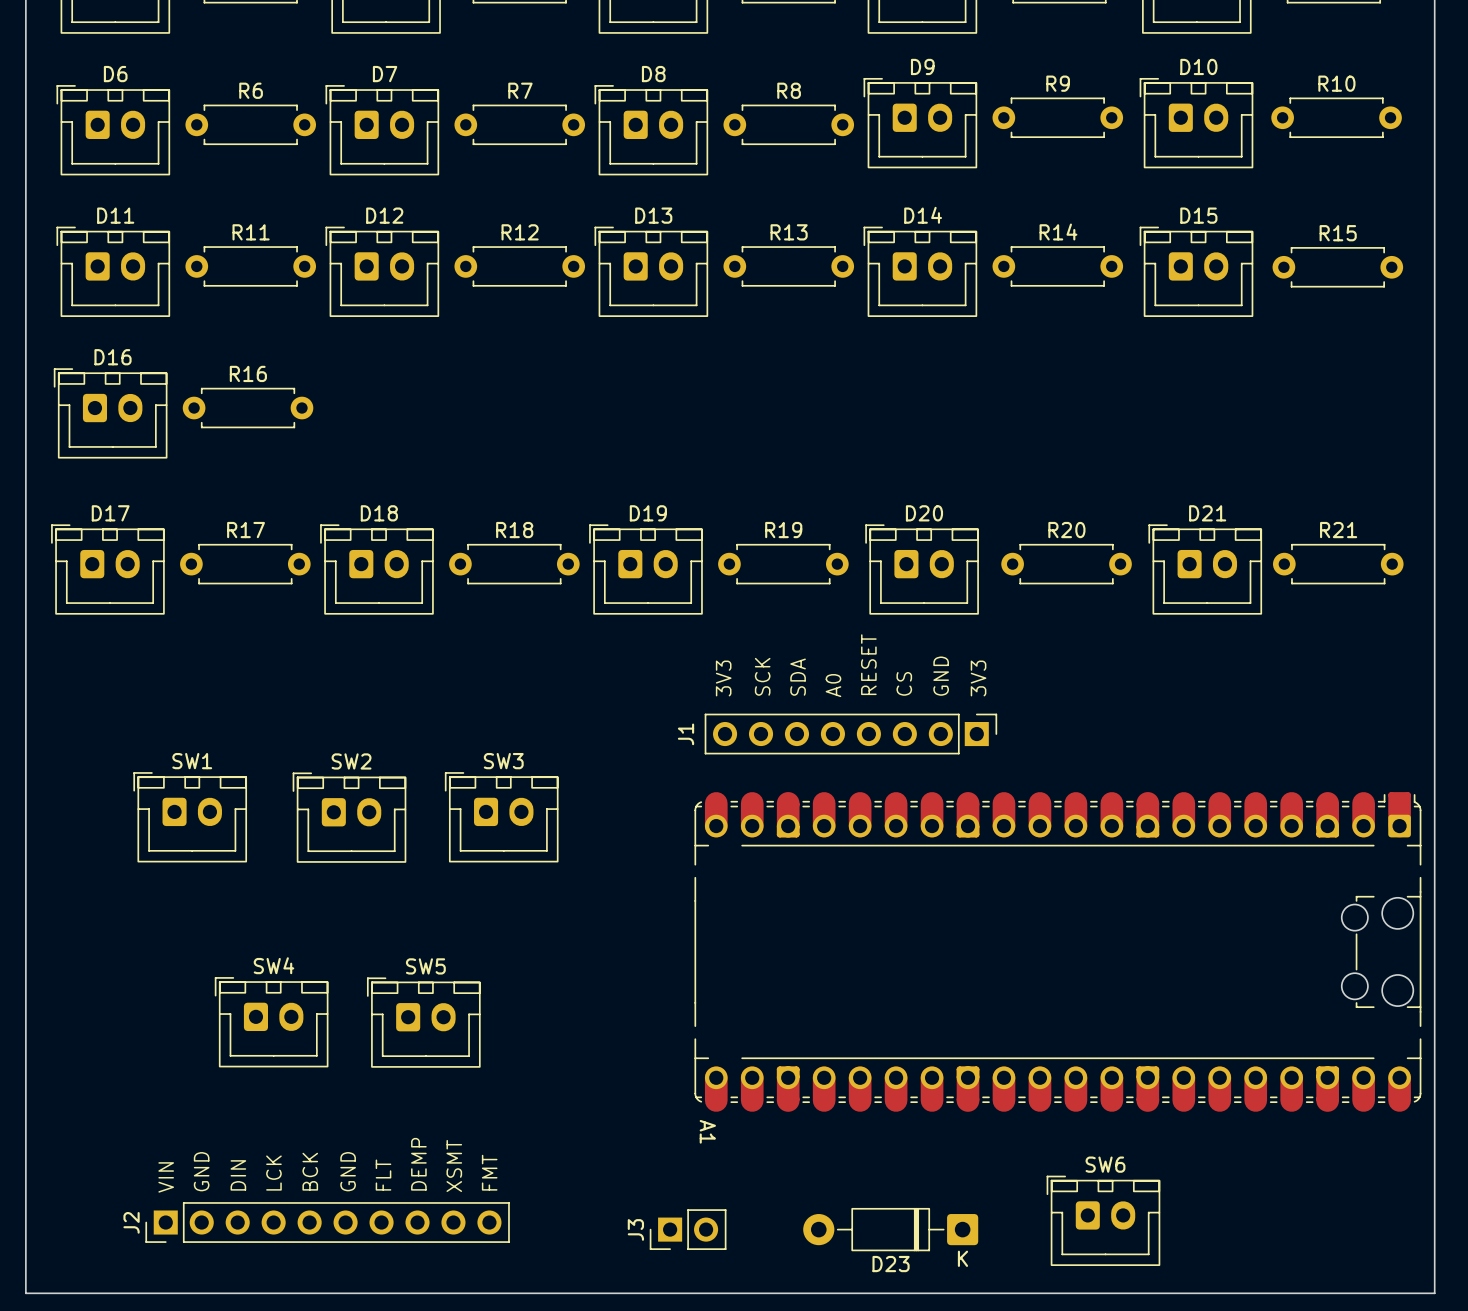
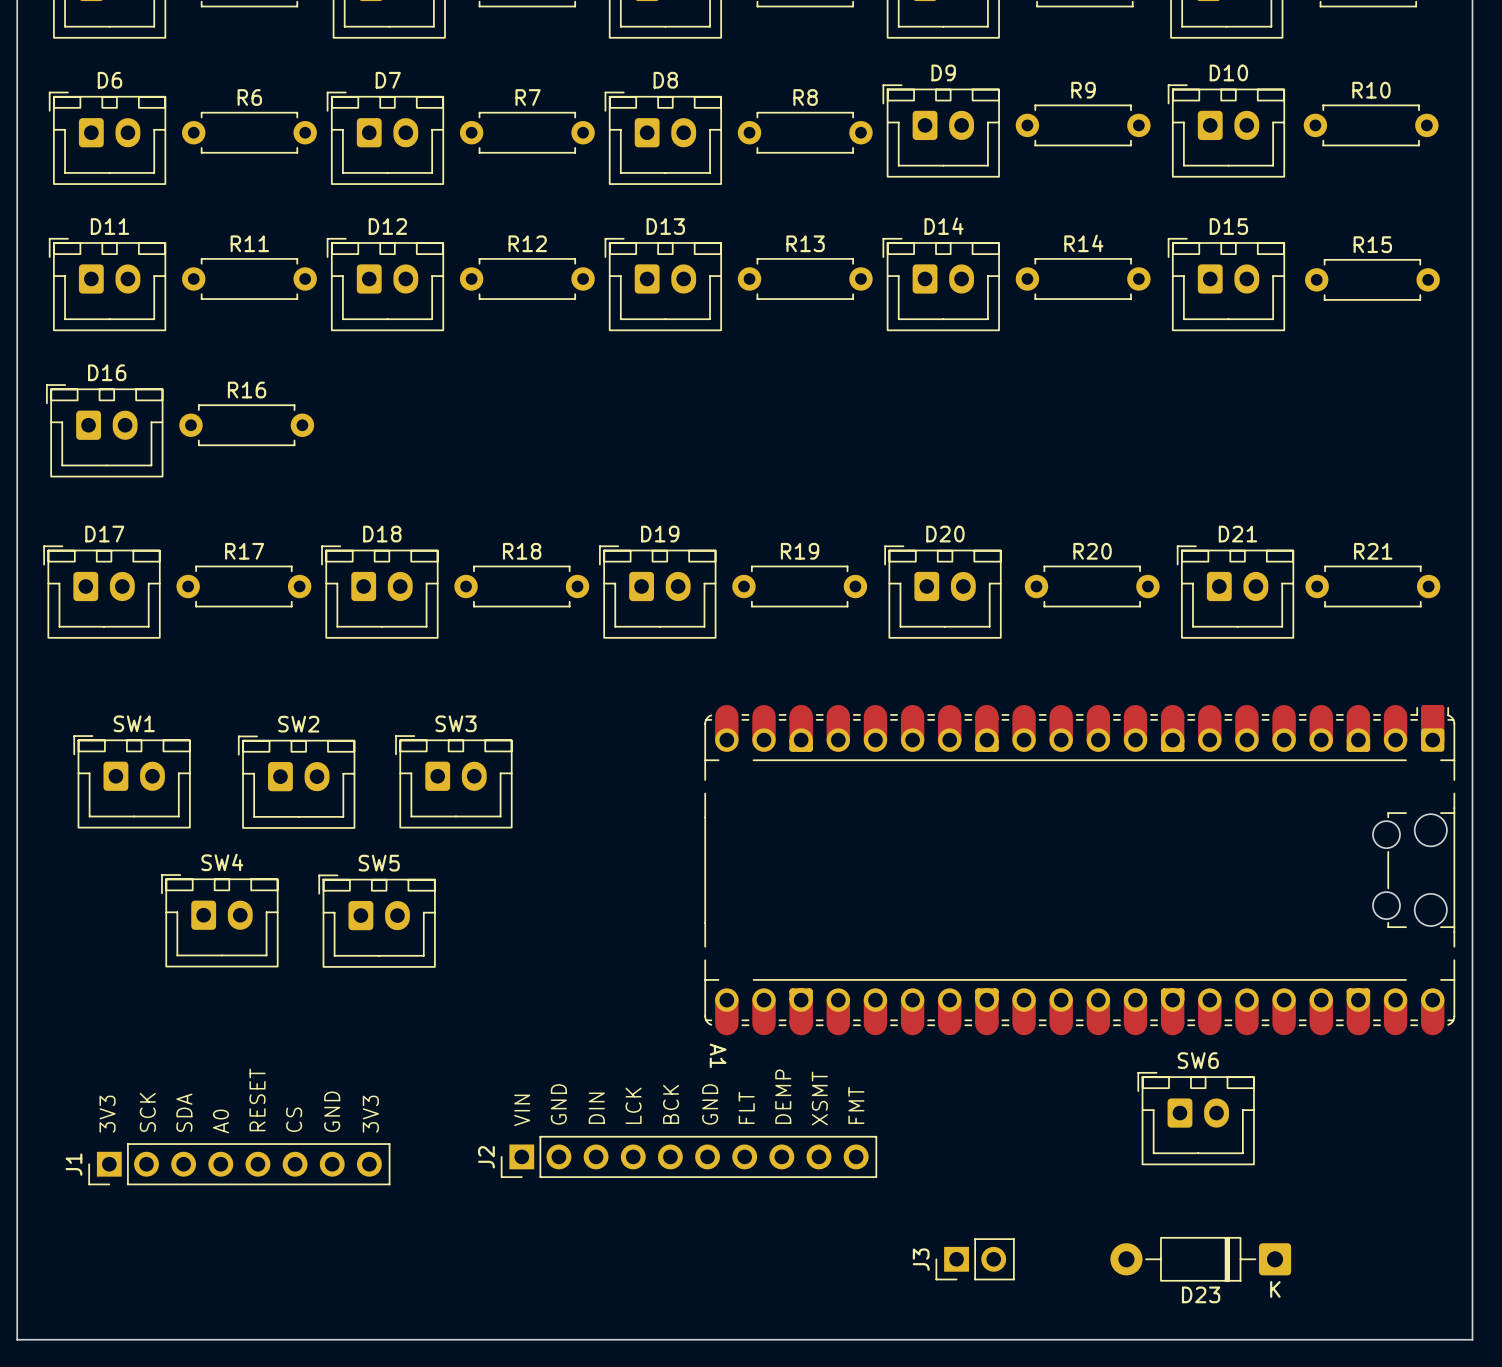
J1 footprint: [704, 713, 998, 755] -> [88, 1143, 391, 1186]
SW1 position: (190, 817) -> (132, 781)
SW2 position: (349, 817) -> (296, 782)
SW3 position: (501, 817) -> (453, 781)
A1 position: (1057, 951) -> (1079, 870)
SW4 position: (271, 1022) -> (219, 920)
SW5 position: (423, 1022) -> (377, 921)
SW6 position: (1103, 1220) -> (1196, 1118)
J2 position: (327, 1222) -> (688, 1156)
J3 position: (688, 1229) -> (975, 1259)
D23 position: (890, 1229) -> (1200, 1259)

